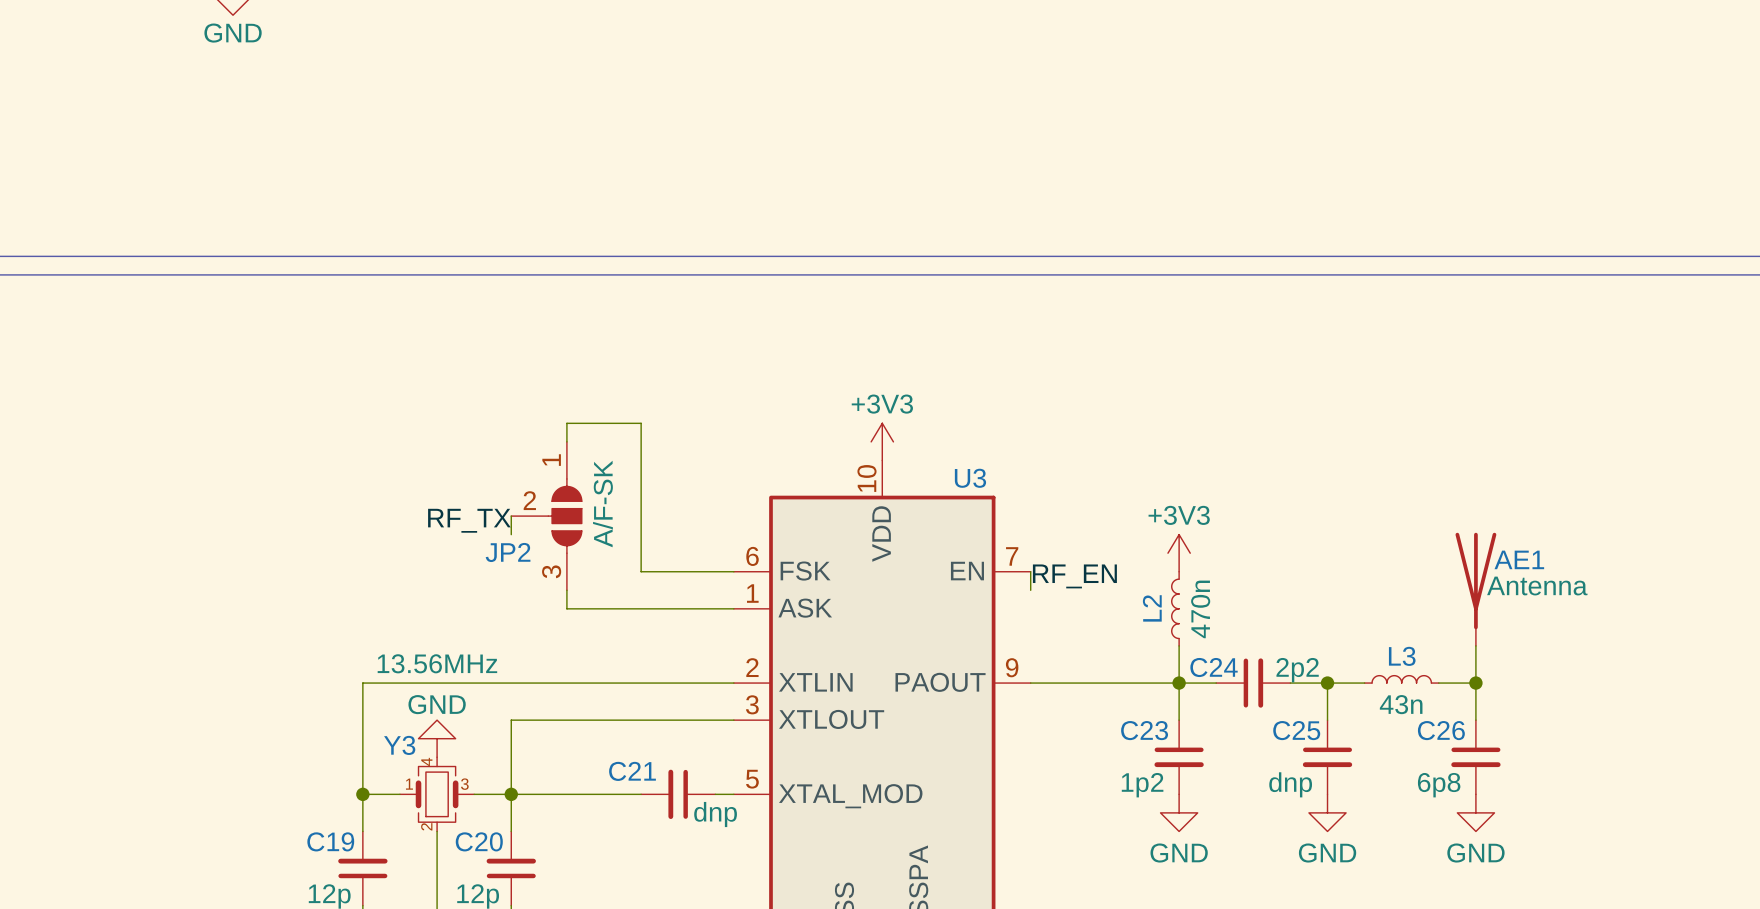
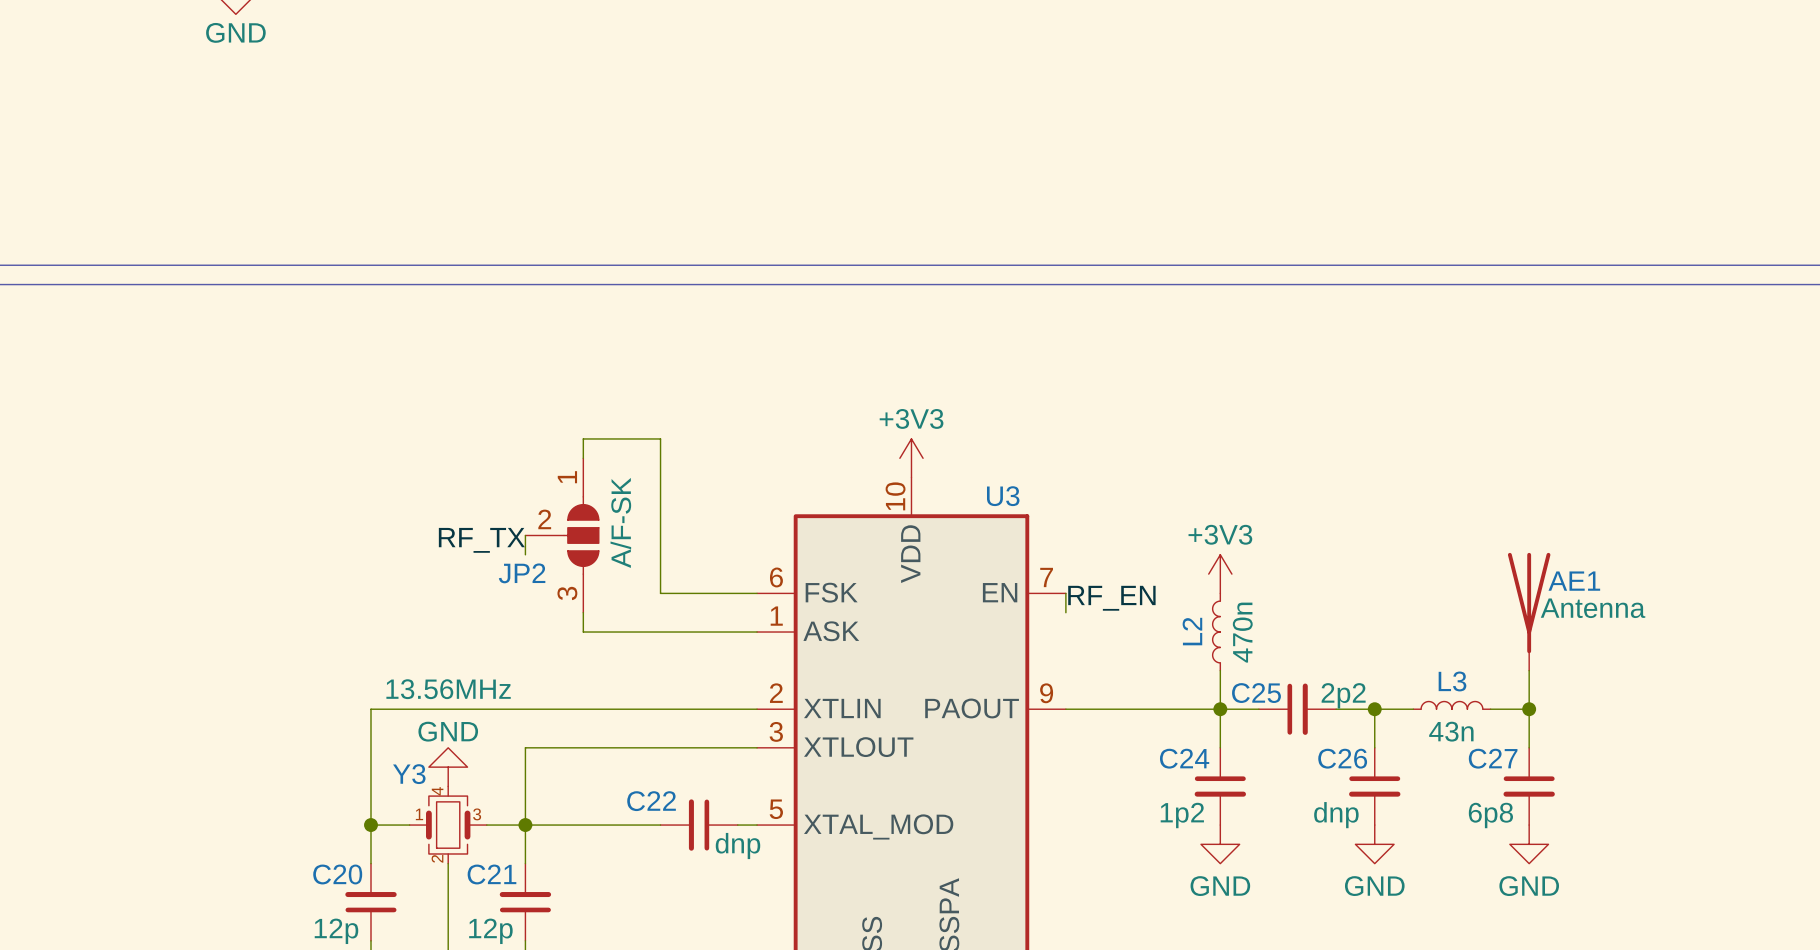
C24 name: C24 (1214, 667) -> C25 (1256, 693)
C23 name: C23 (1144, 730) -> C24 (1184, 758)
C25 name: C25 (1296, 730) -> C26 (1342, 758)
C26 name: C26 (1441, 730) -> C27 (1493, 758)
C21 name: C21 (632, 771) -> C22 (651, 801)
C19 name: C19 (330, 841) -> C20 (337, 874)
C20 name: C20 (479, 841) -> C21 (491, 874)

